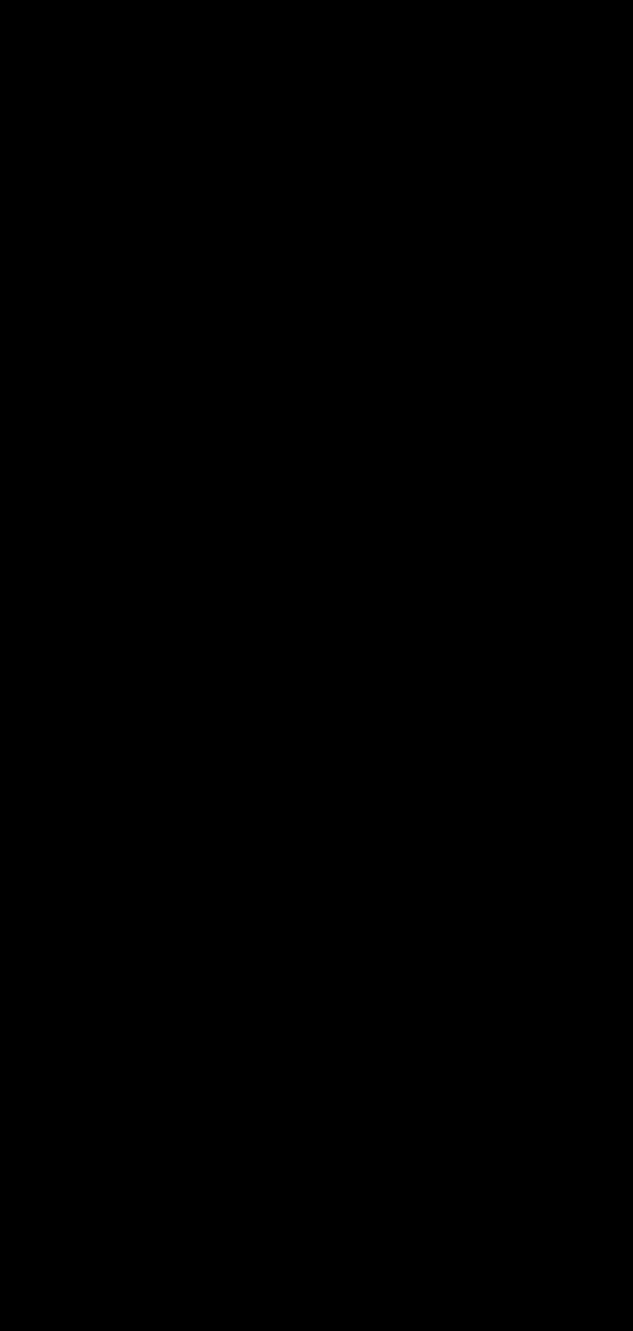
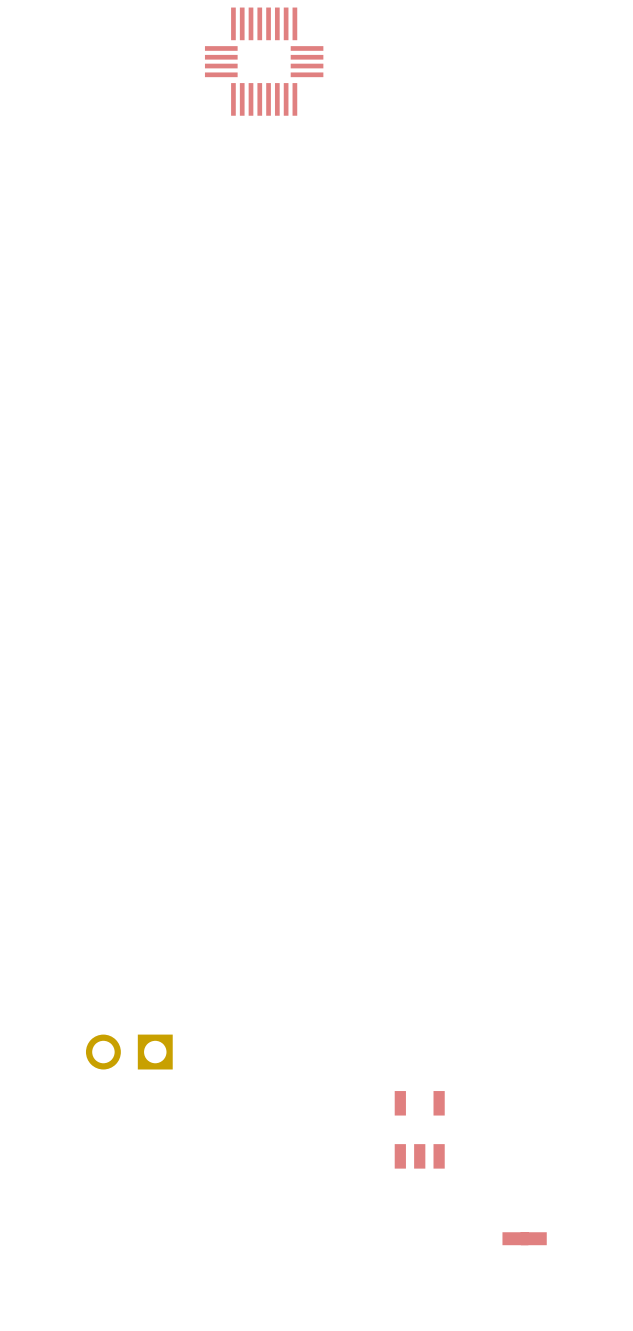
part: none -> (264, 61)
part: none -> (129, 1052)
part: none -> (419, 1129)
part: none -> (524, 1238)

